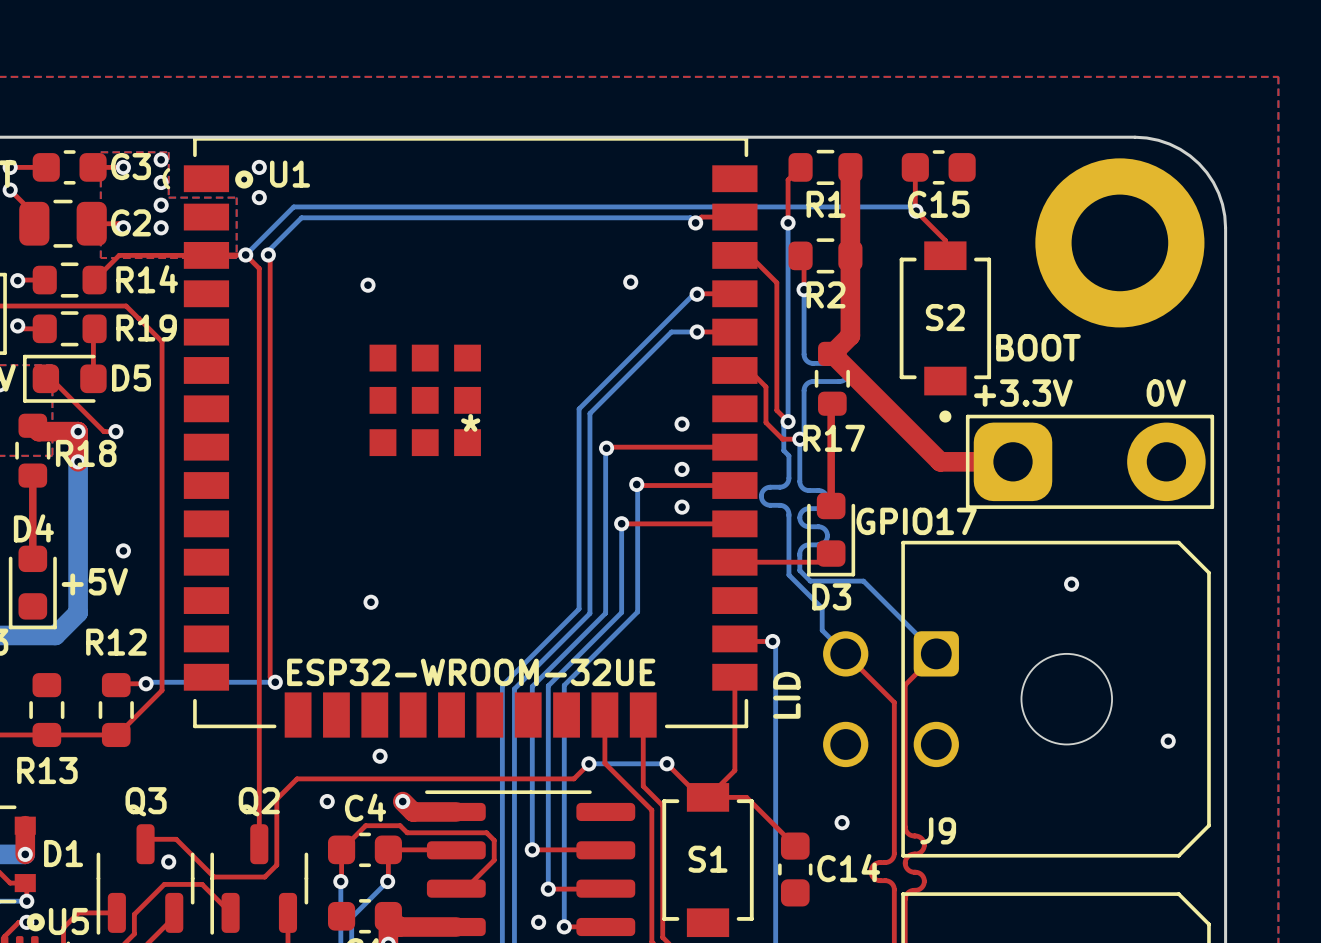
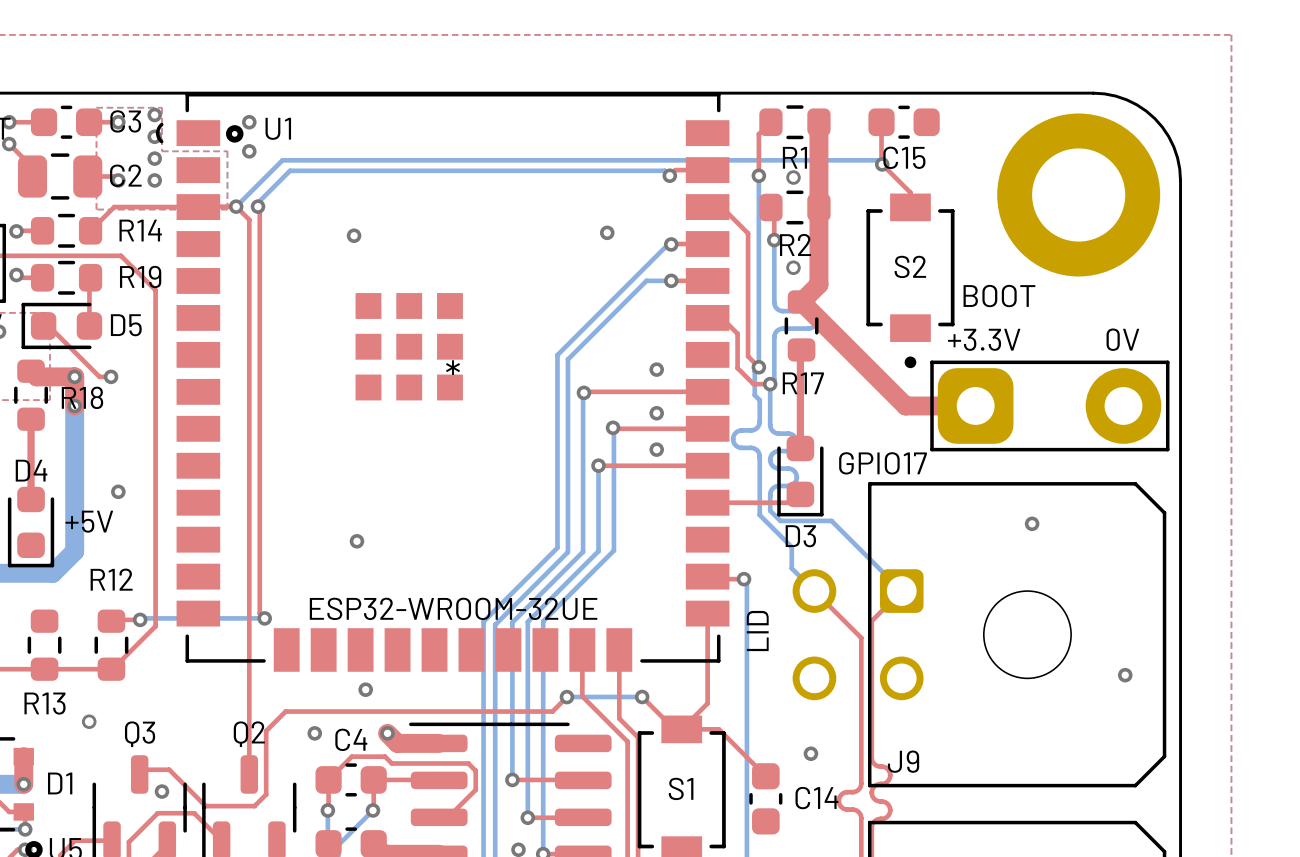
via: none -> (793, 177)
via: none -> (793, 267)
via: none -> (89, 721)

